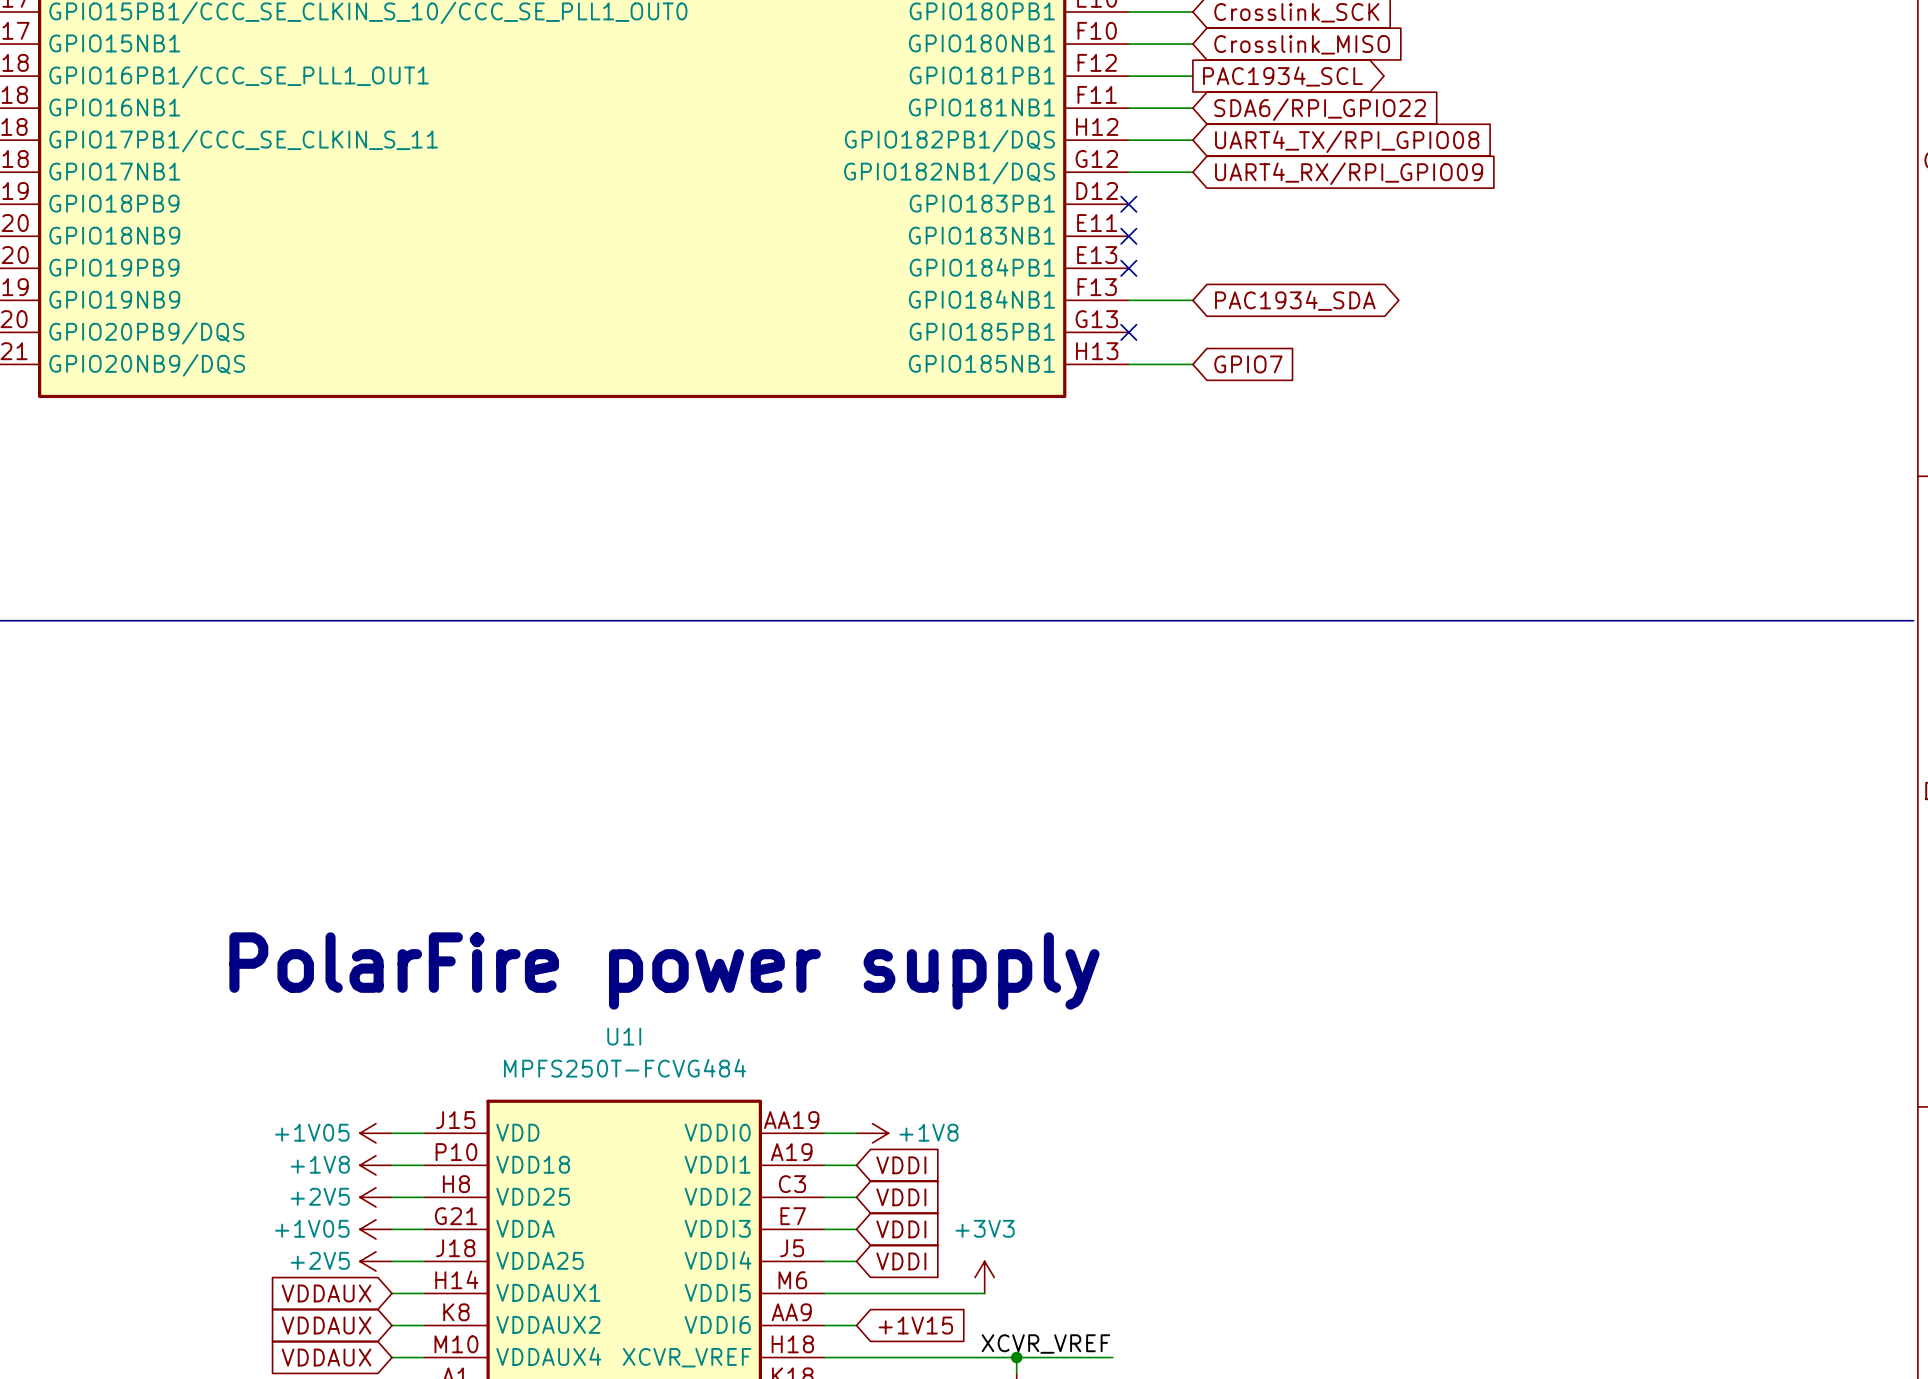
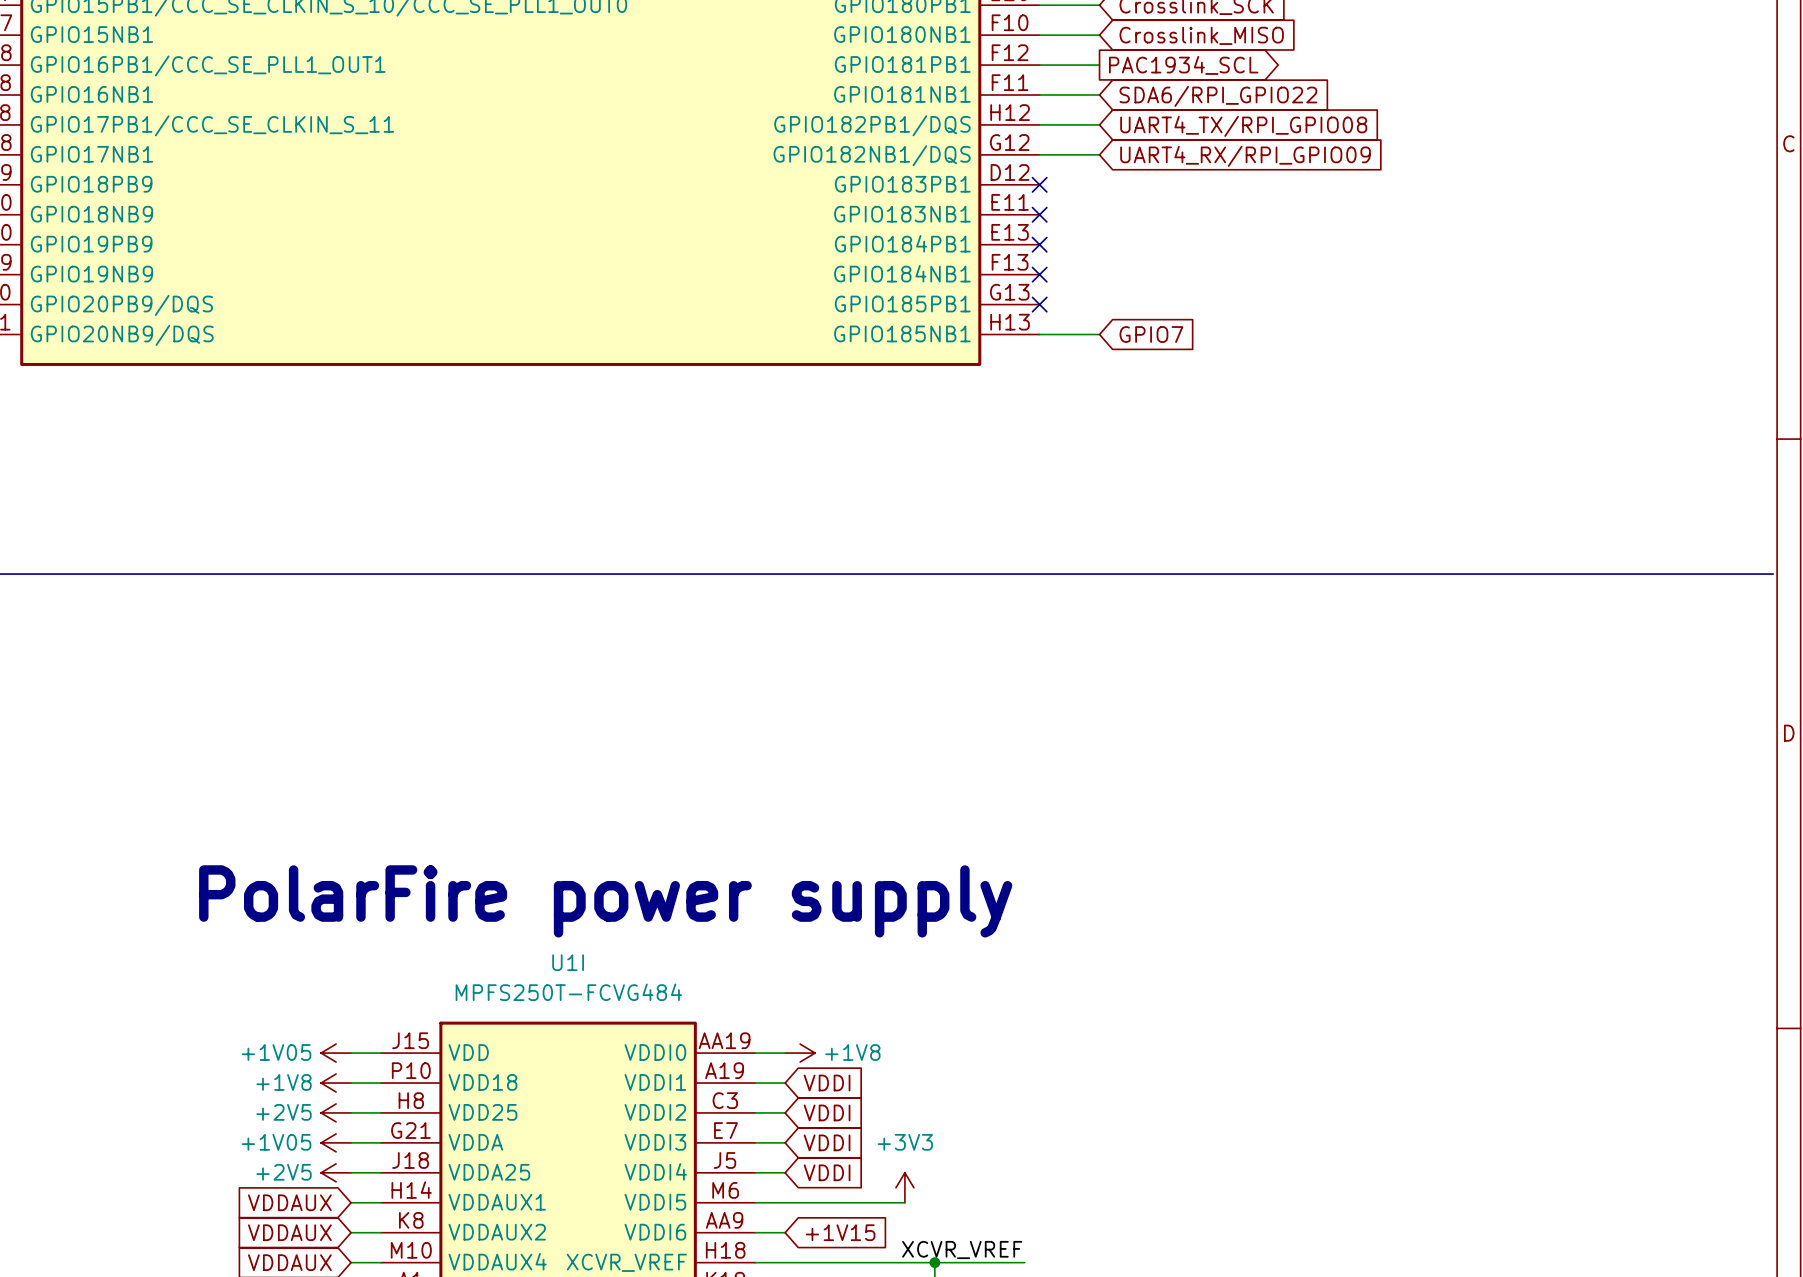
wire: (1128, 300) (1192, 300) -> none
no-connect mark: none -> (1039, 274)
global label: PAC1934_SDA (1295, 300) -> none

